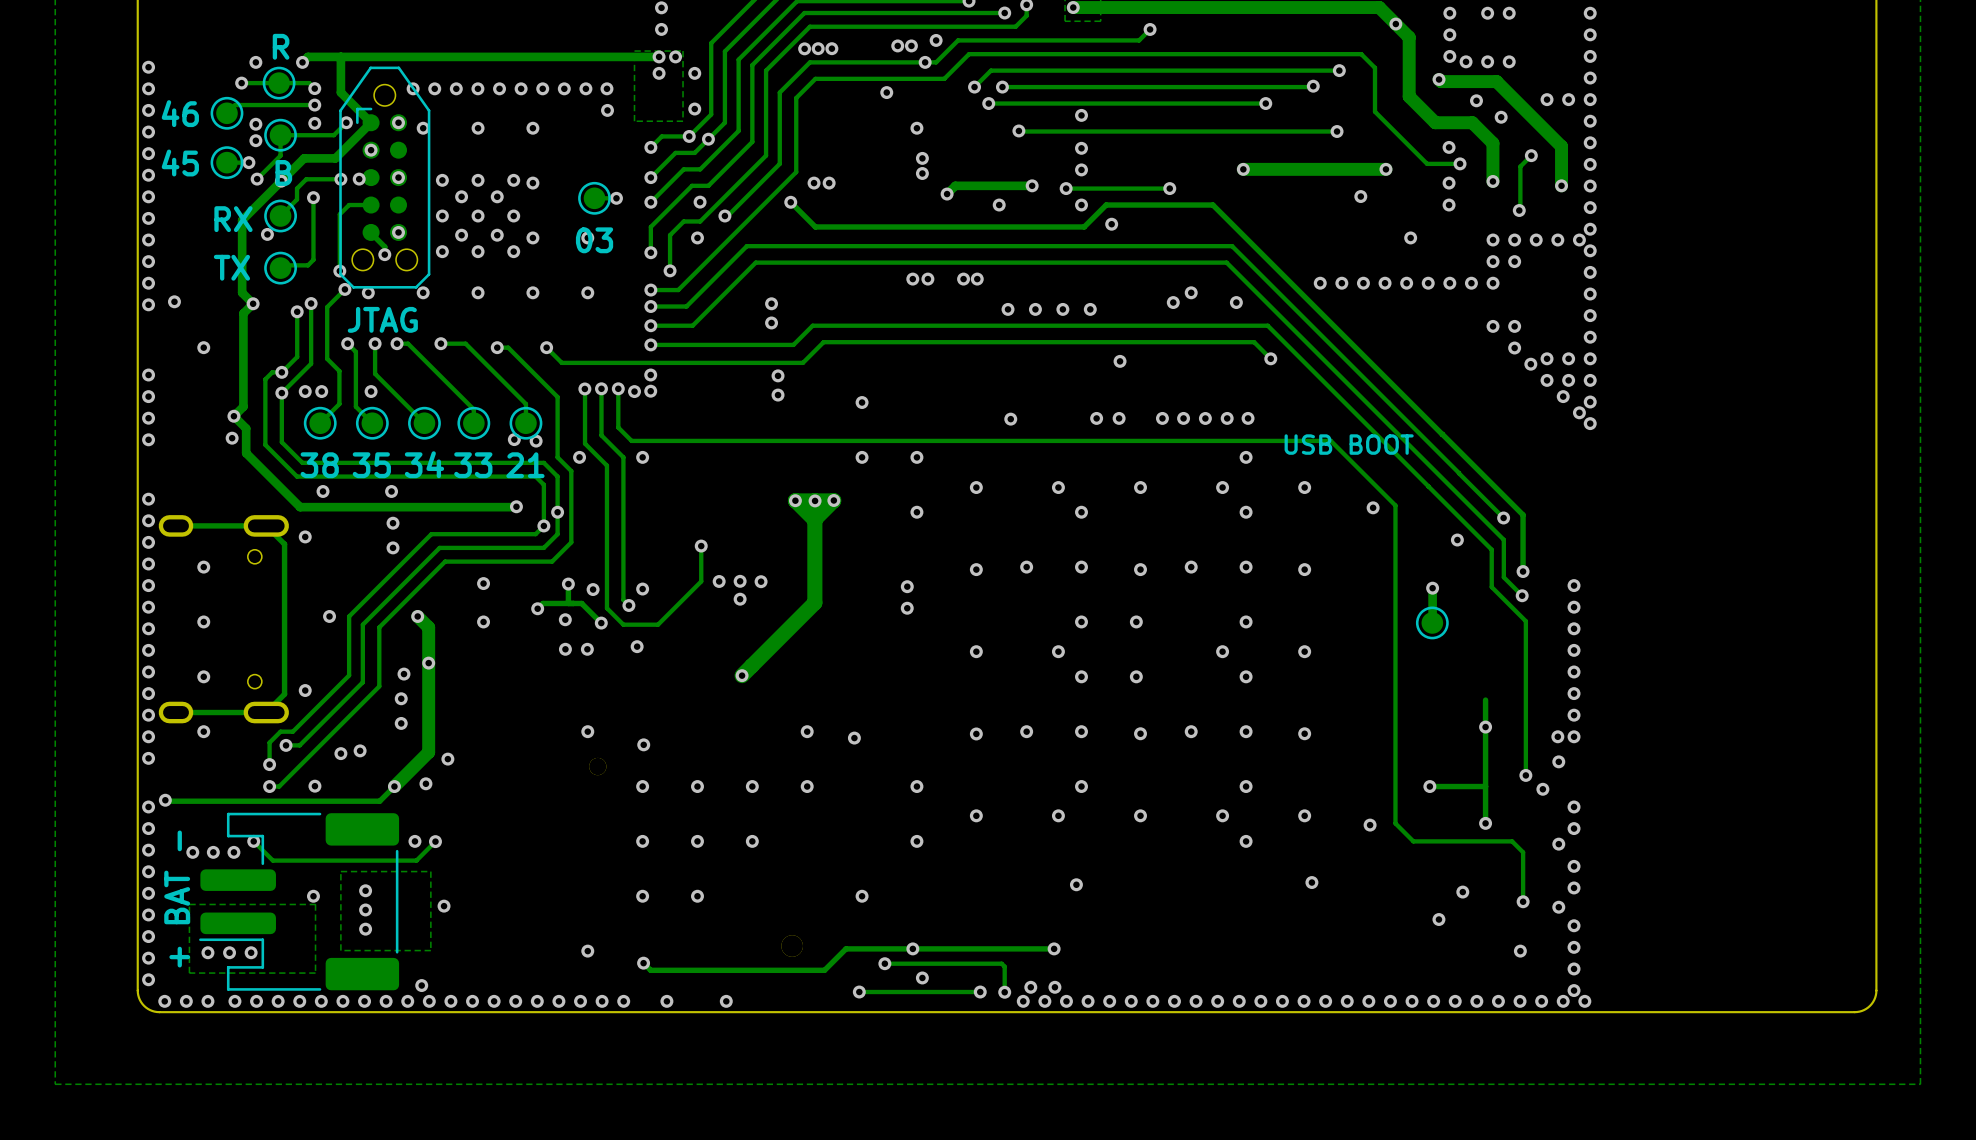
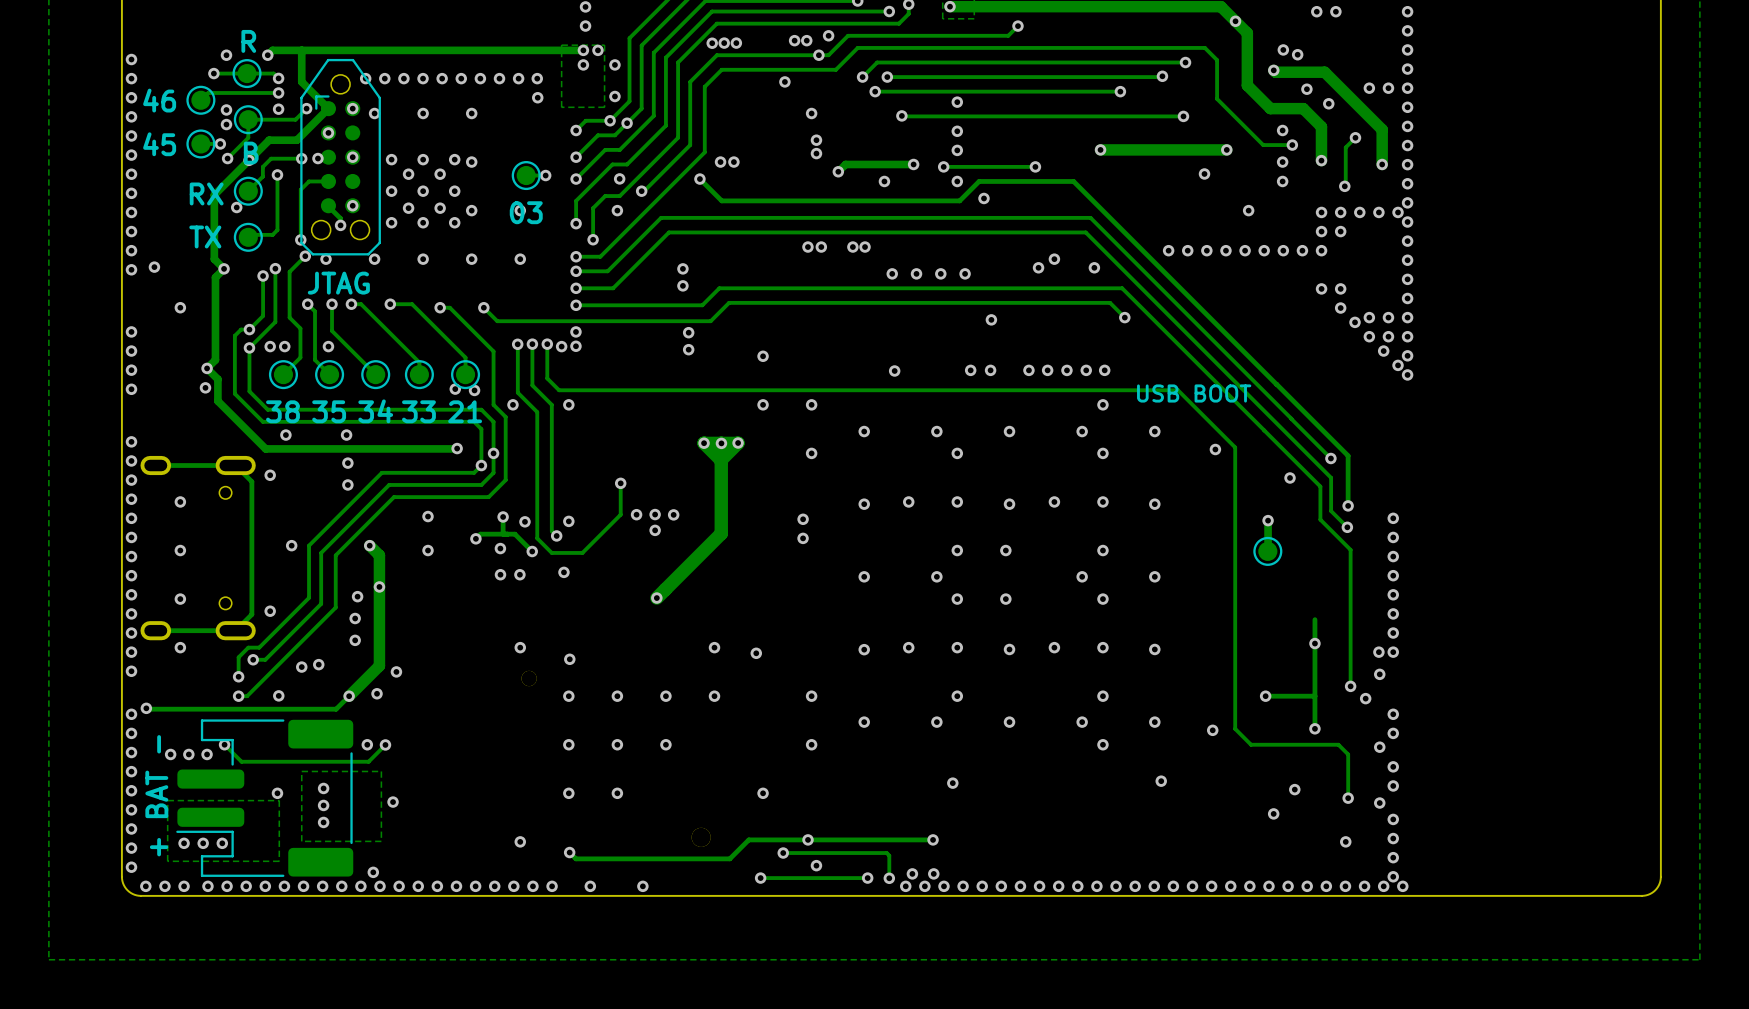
via: (1449, 13) -> none
via: (1449, 34) -> none
via: (1487, 61) -> none
via: (1509, 61) -> none

